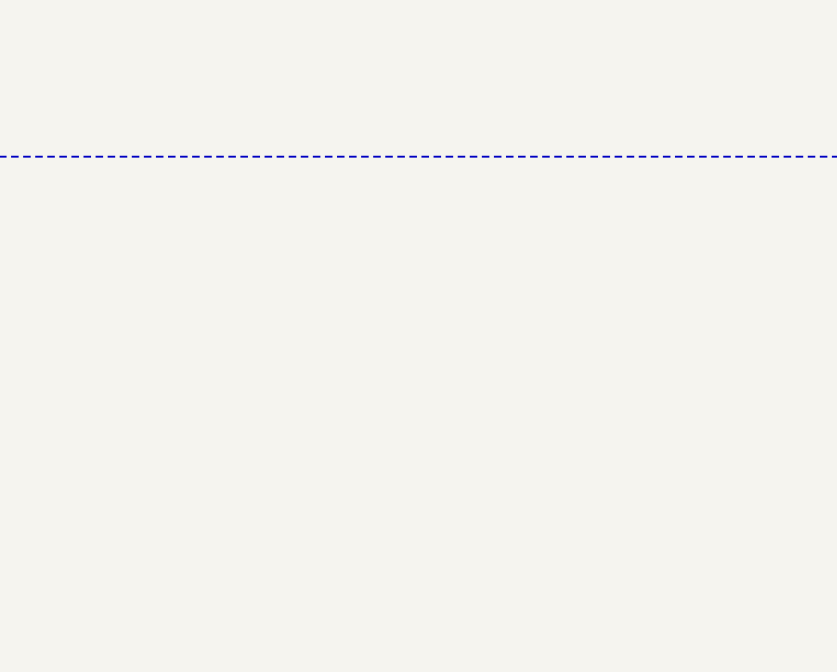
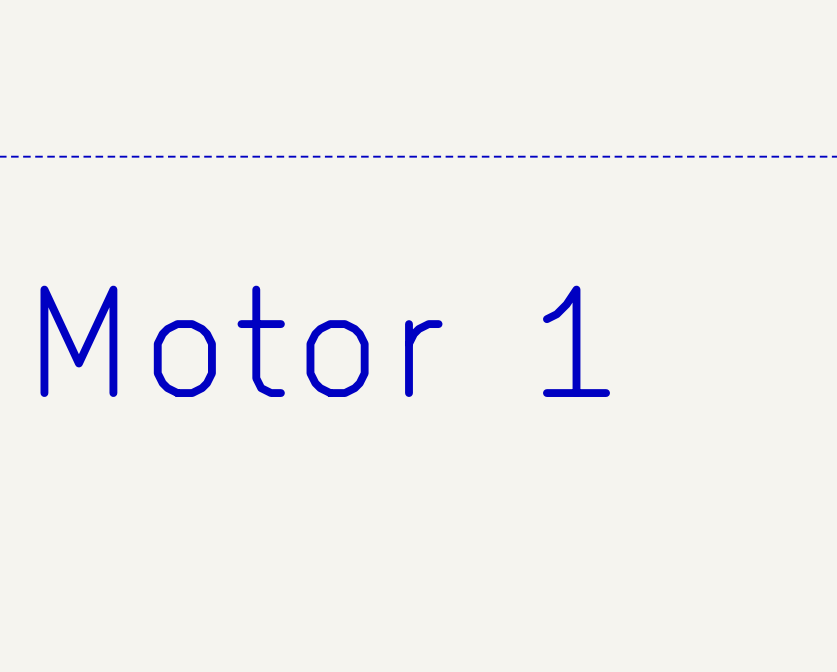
text: none -> Motor 1 (325, 341)

